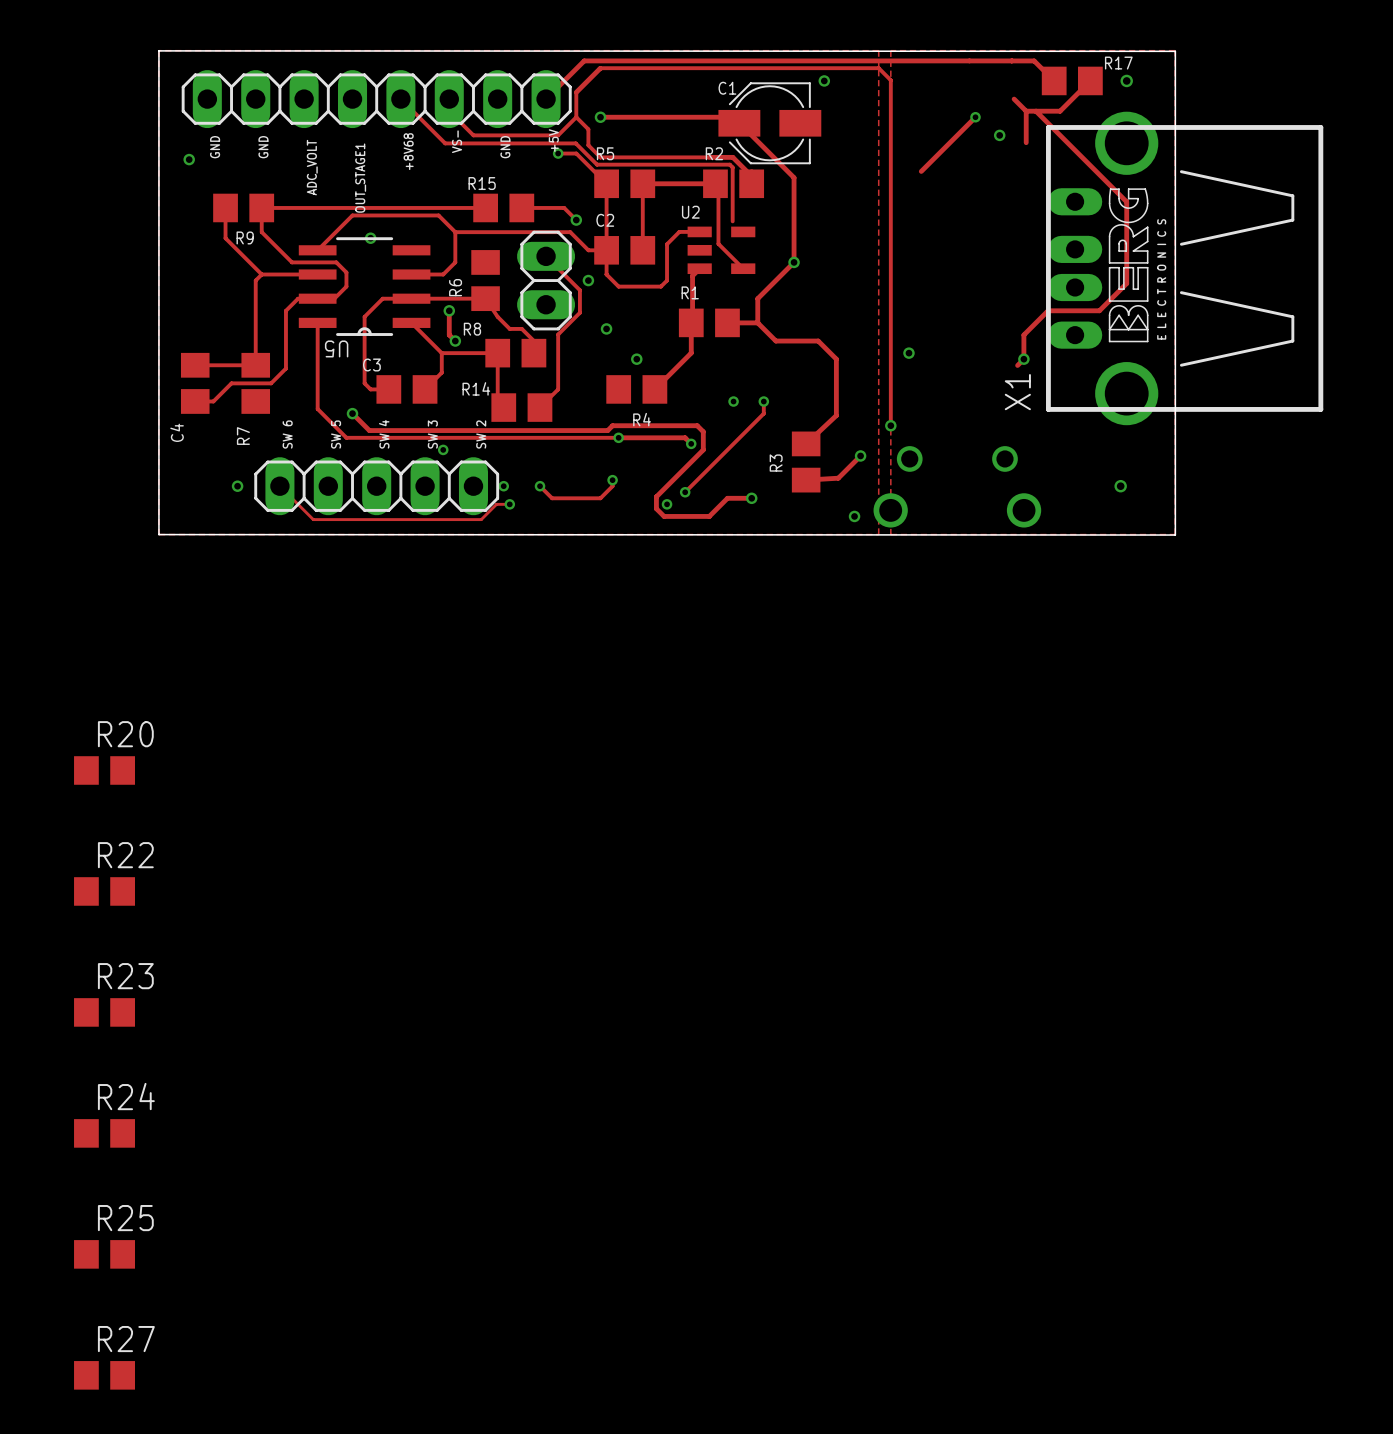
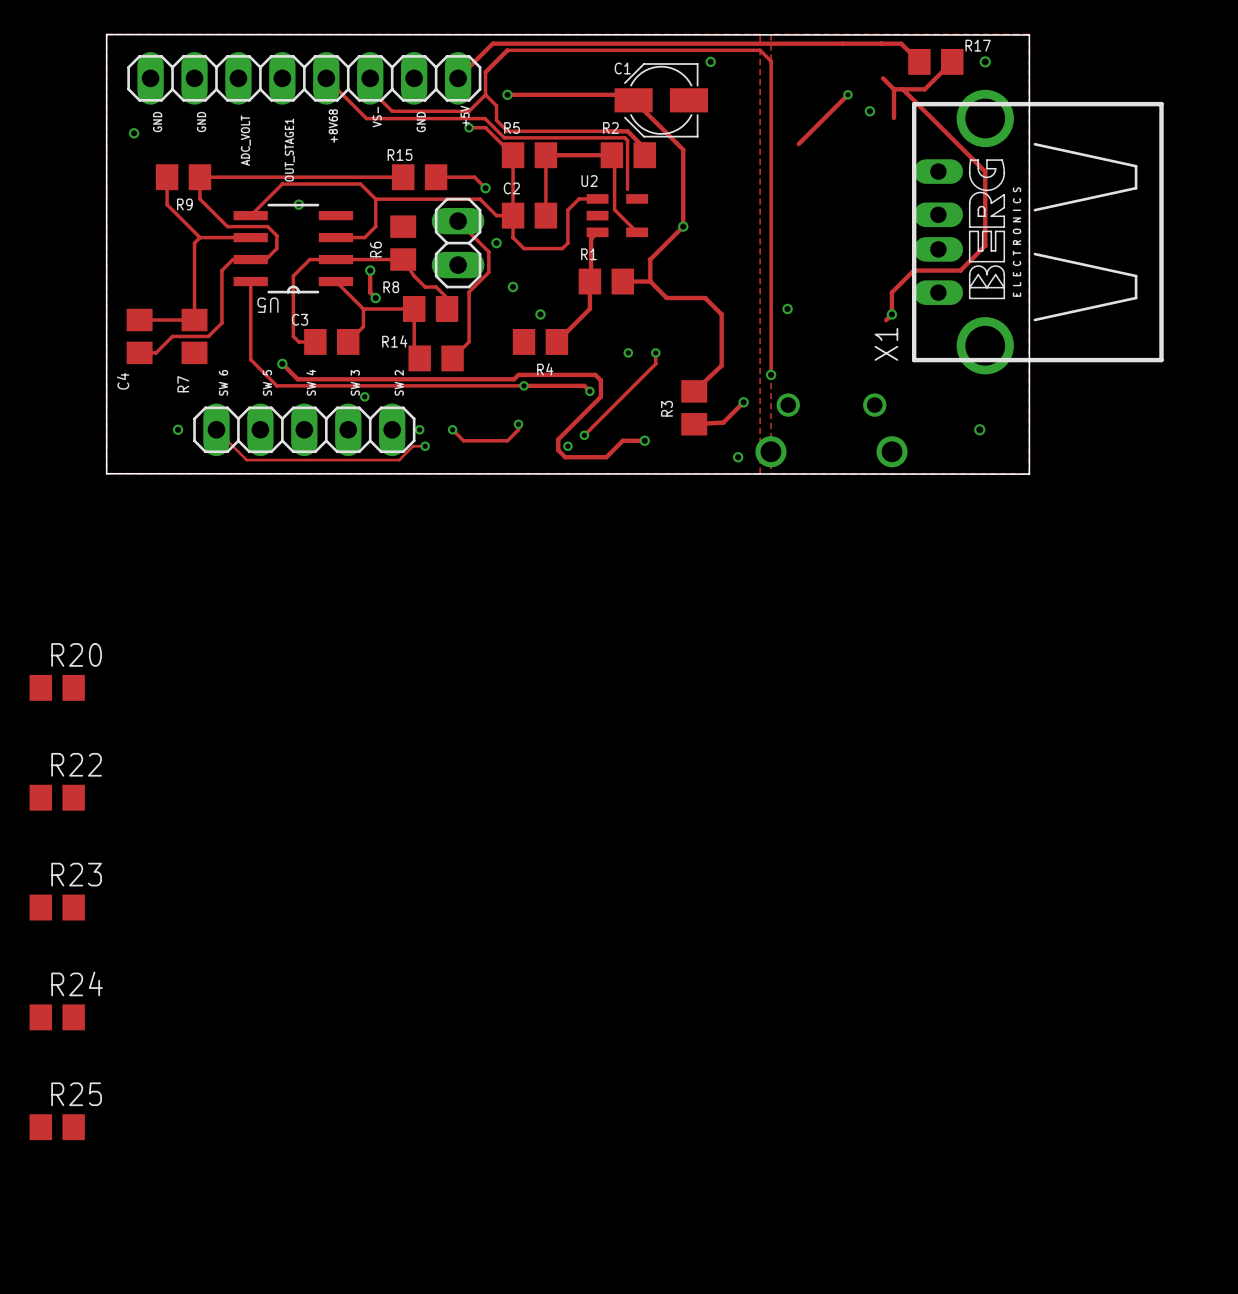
R27: (104, 1375) -> none

